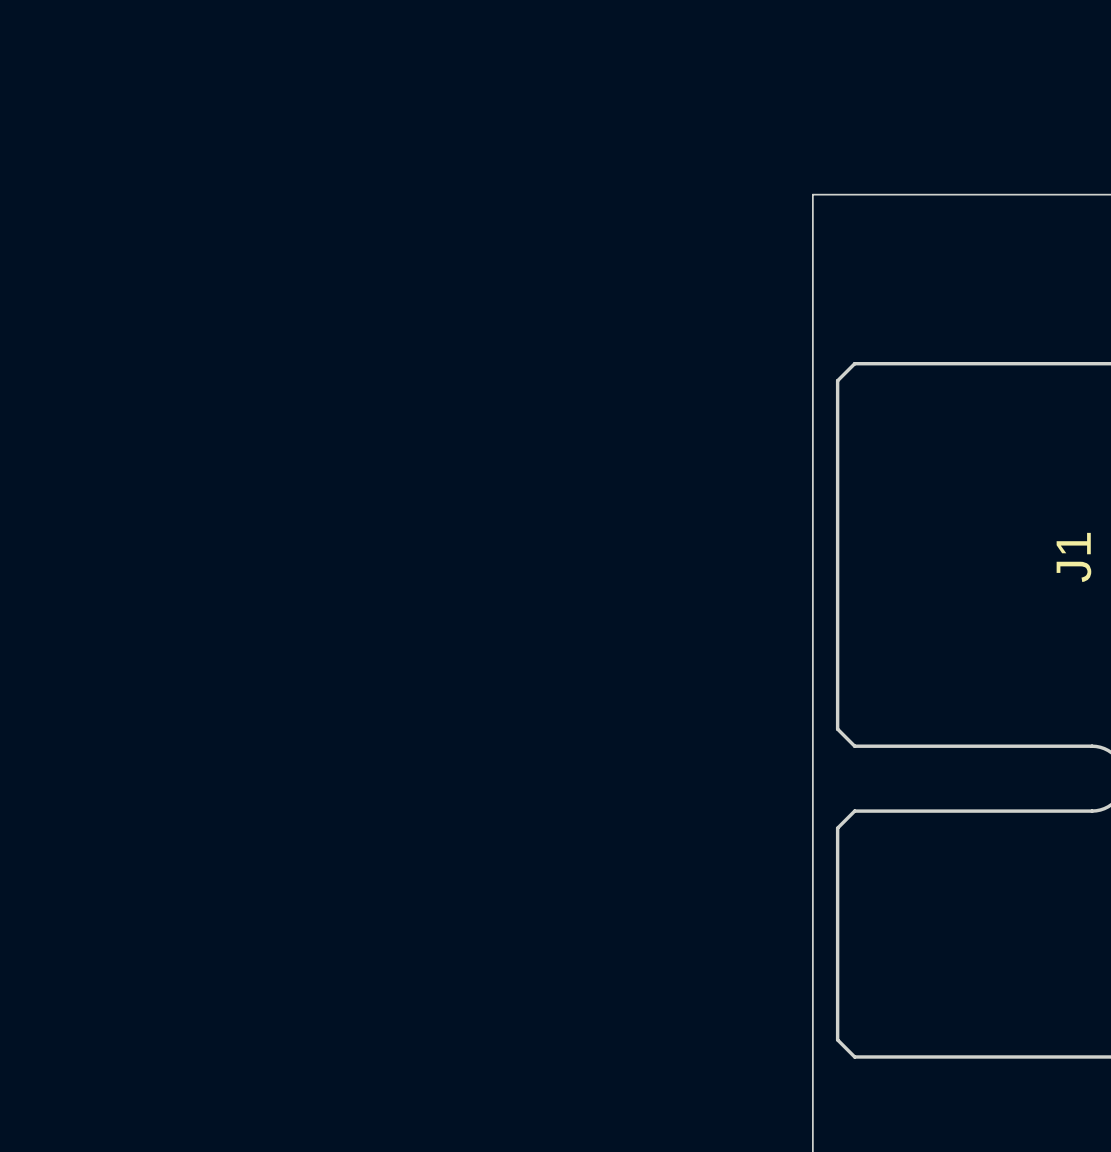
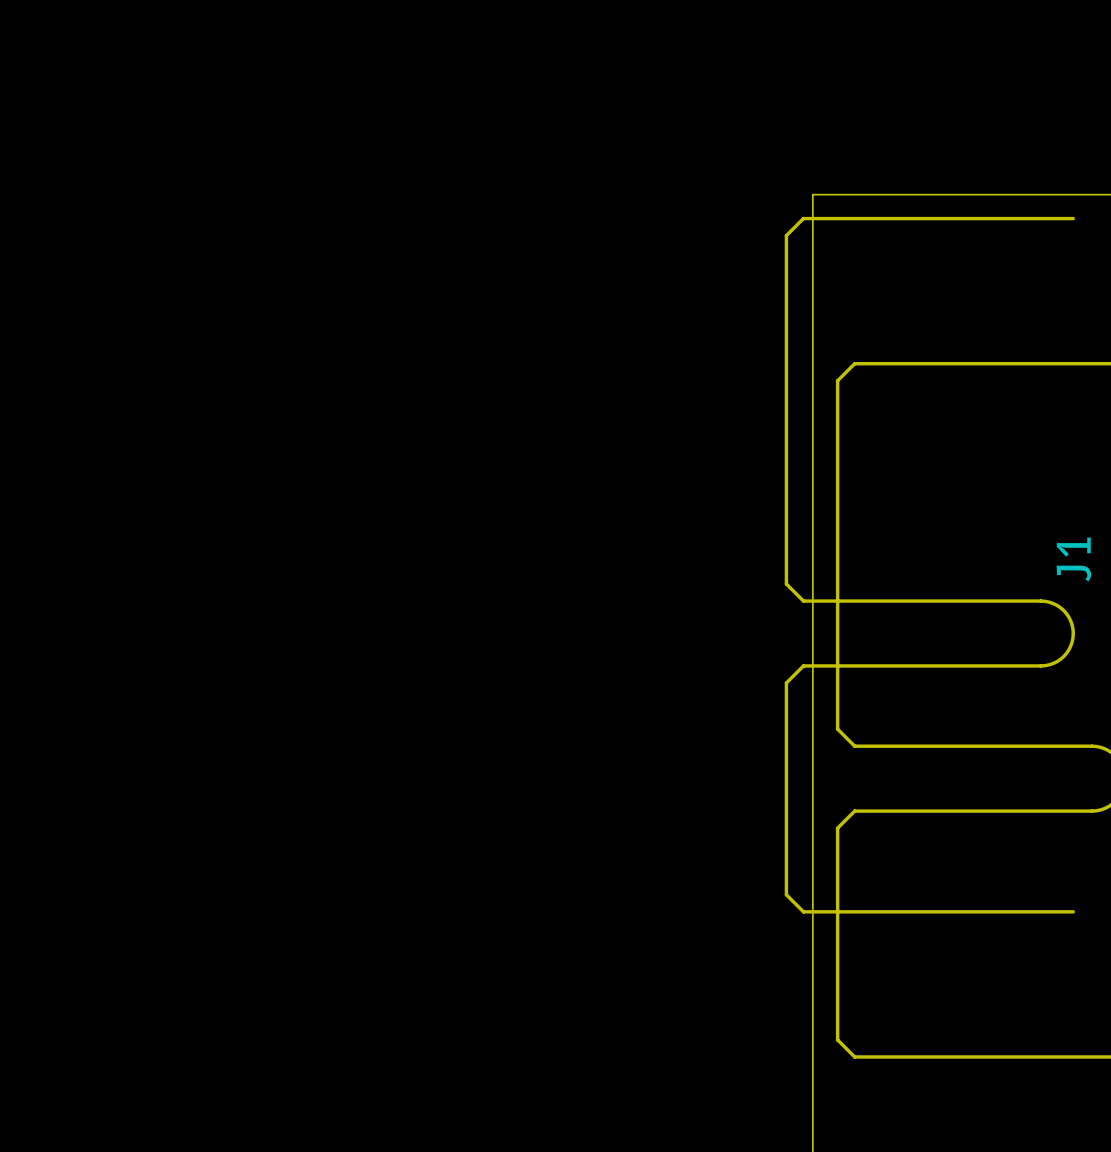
part: none -> (929, 565)

